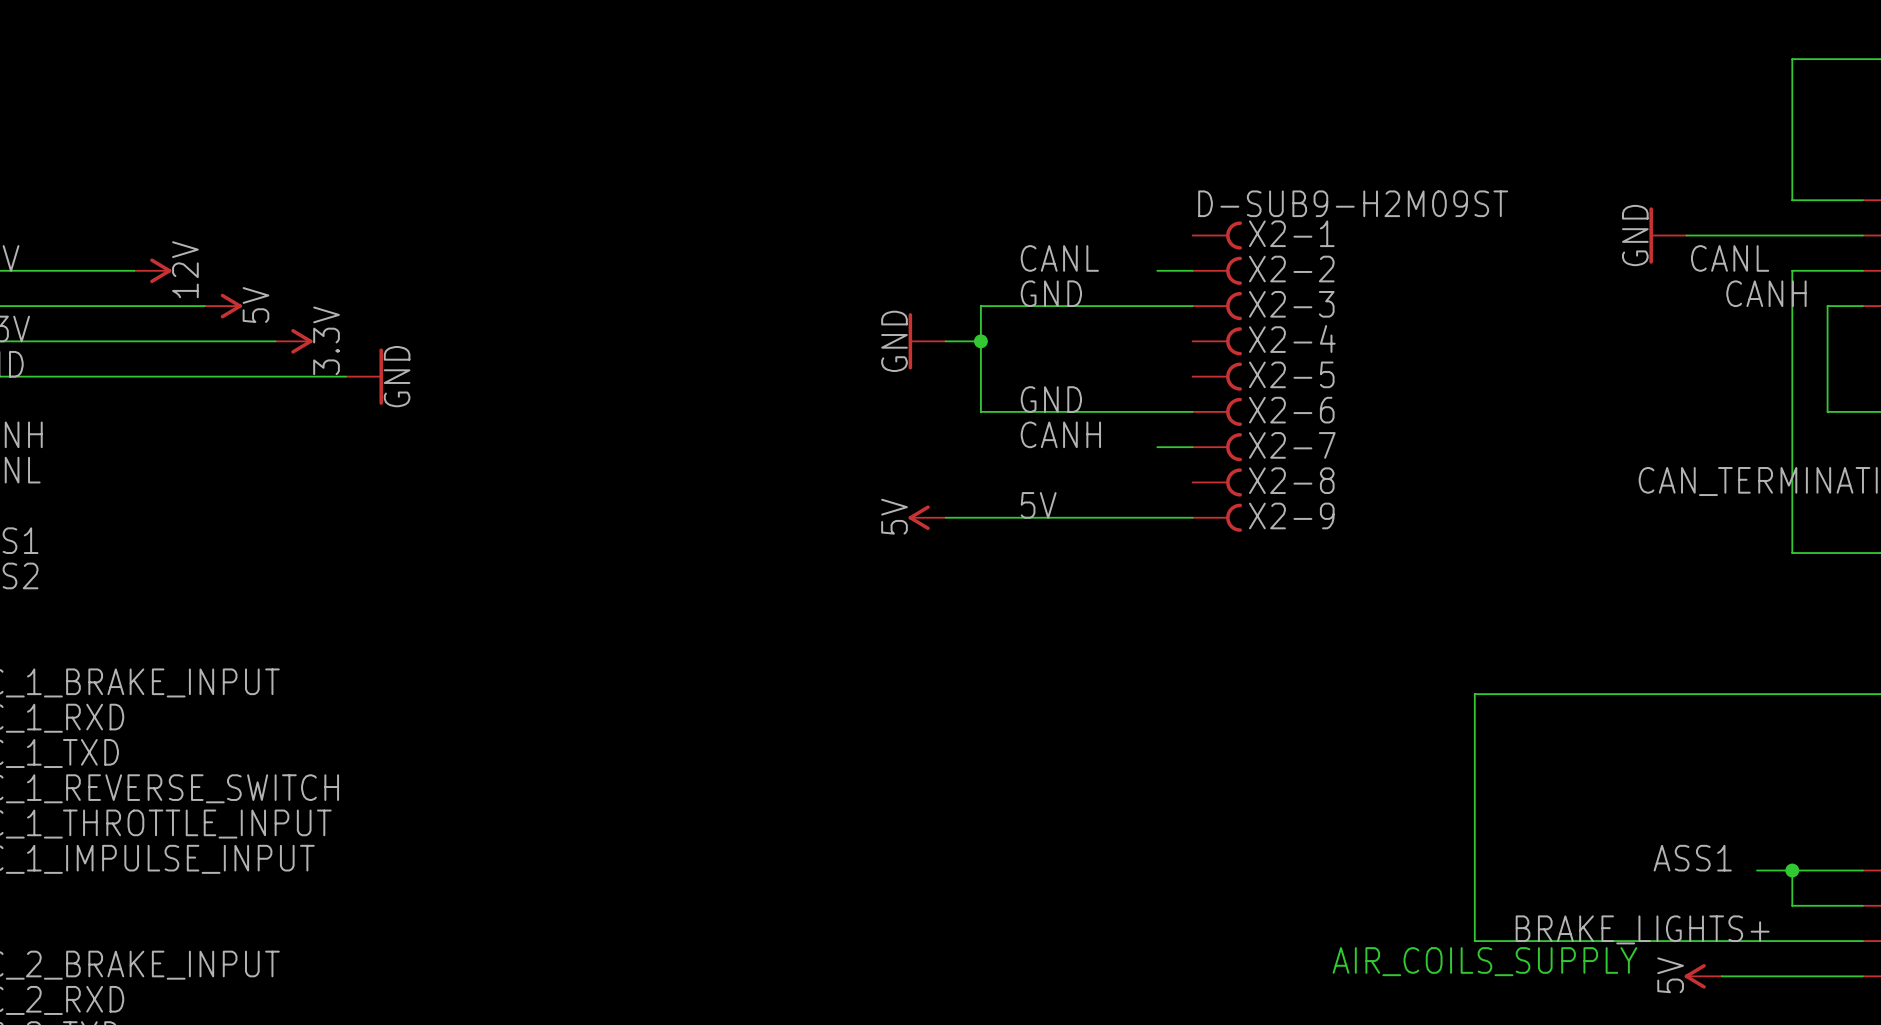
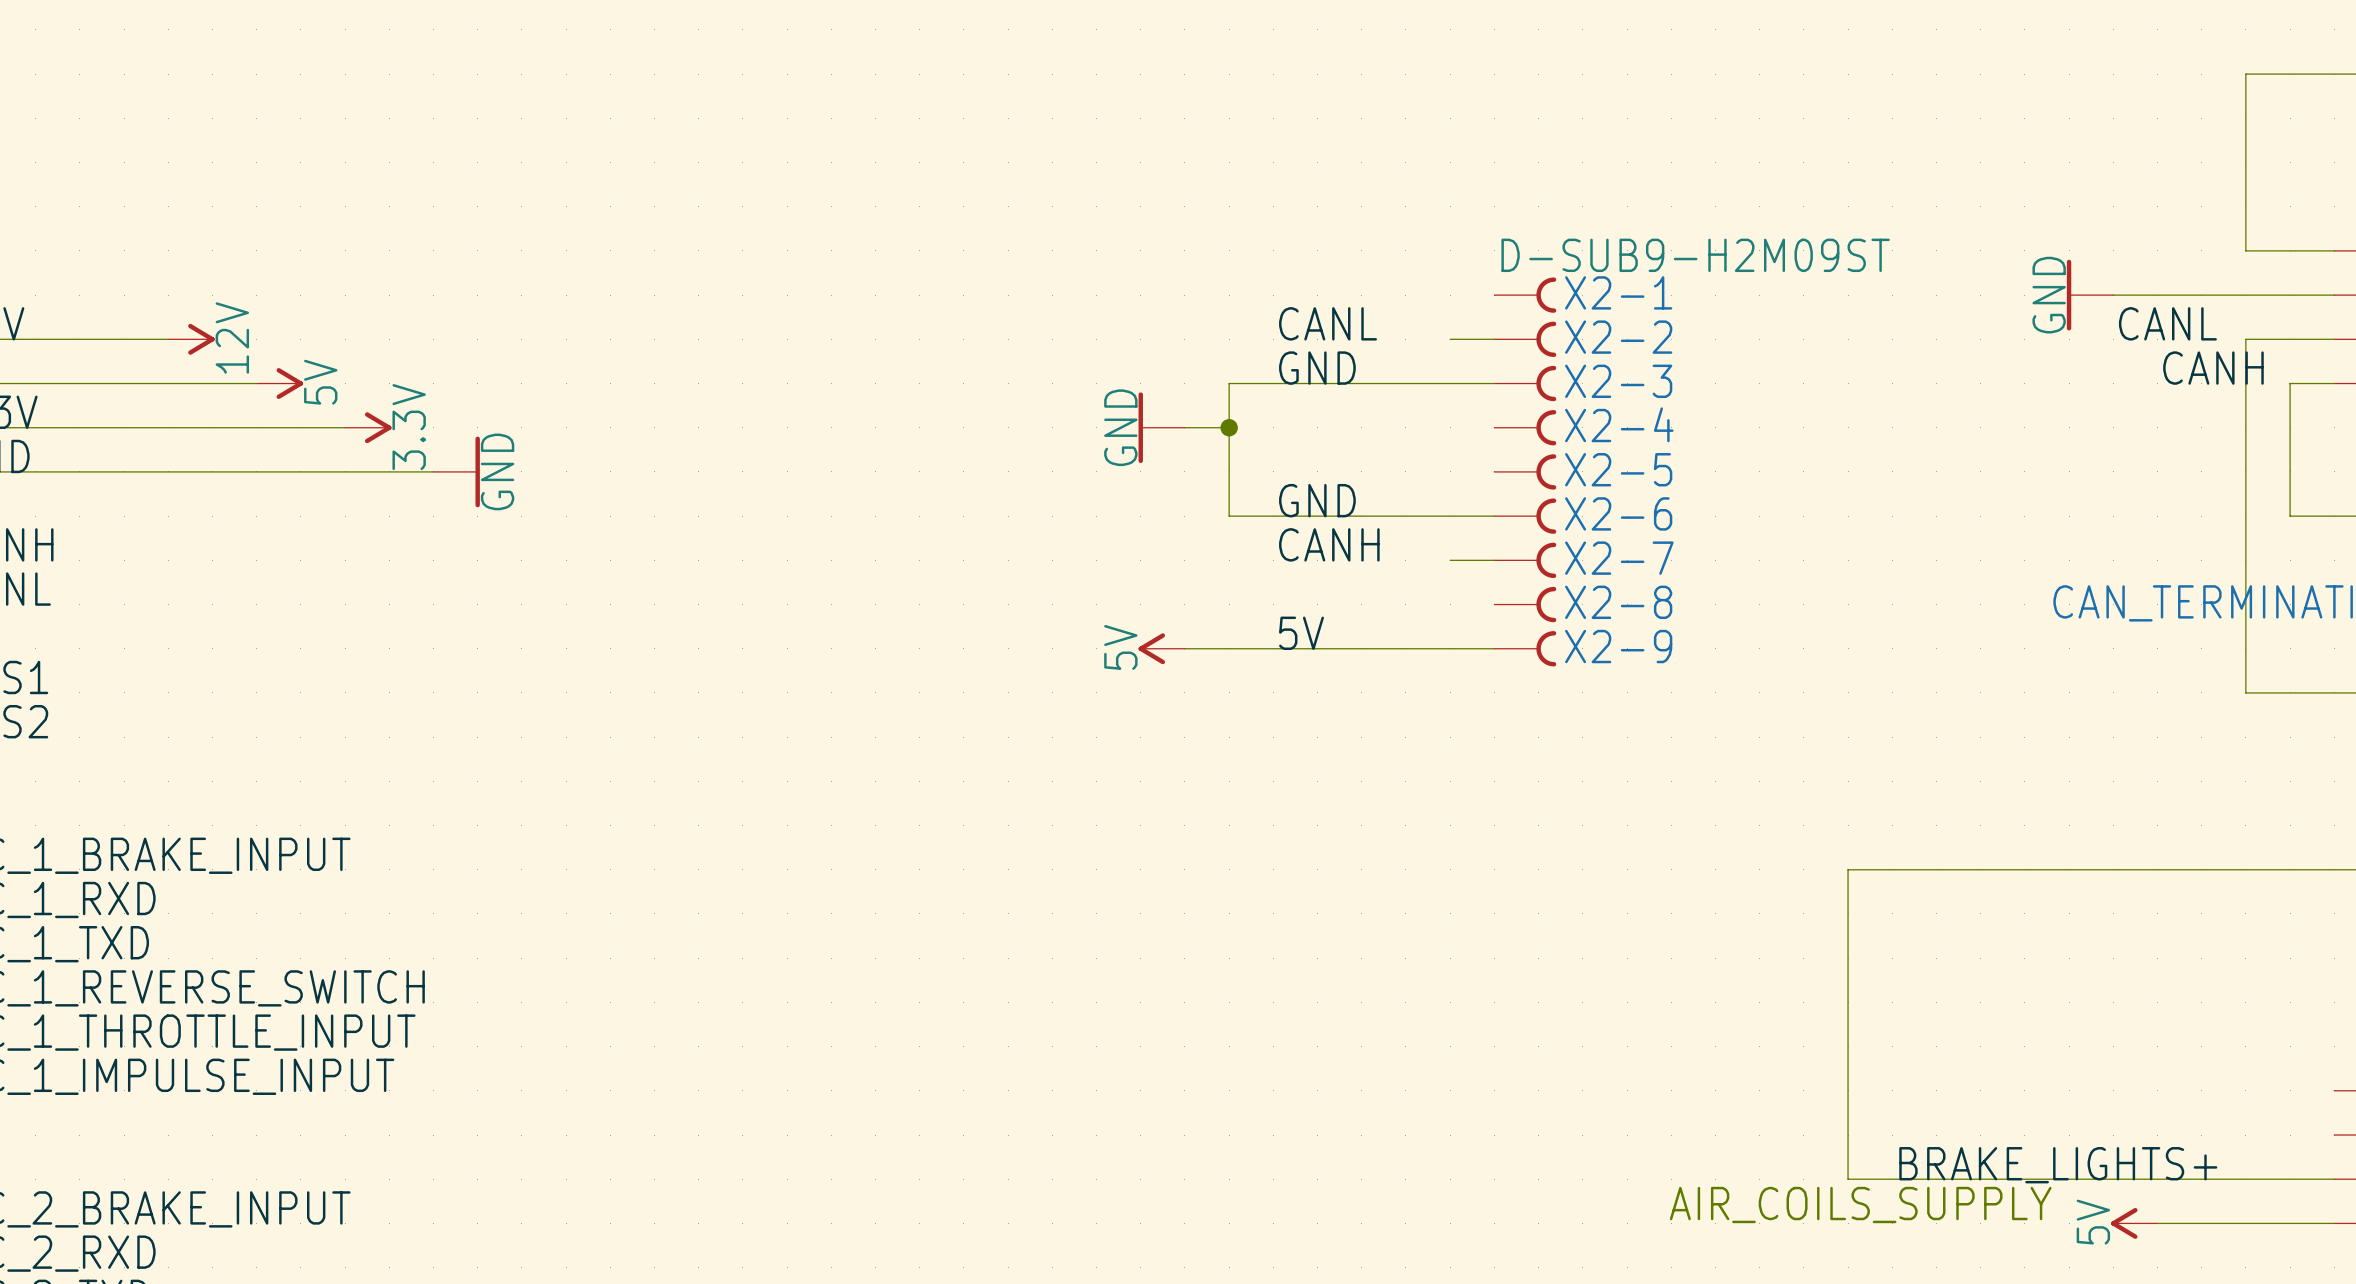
label: ASS1 (1692, 858) -> none
wire: (1757, 870) (1862, 870) -> none
wire: (1792, 870) (1792, 905) (1862, 905) -> none
junction: (1792, 870) -> none

